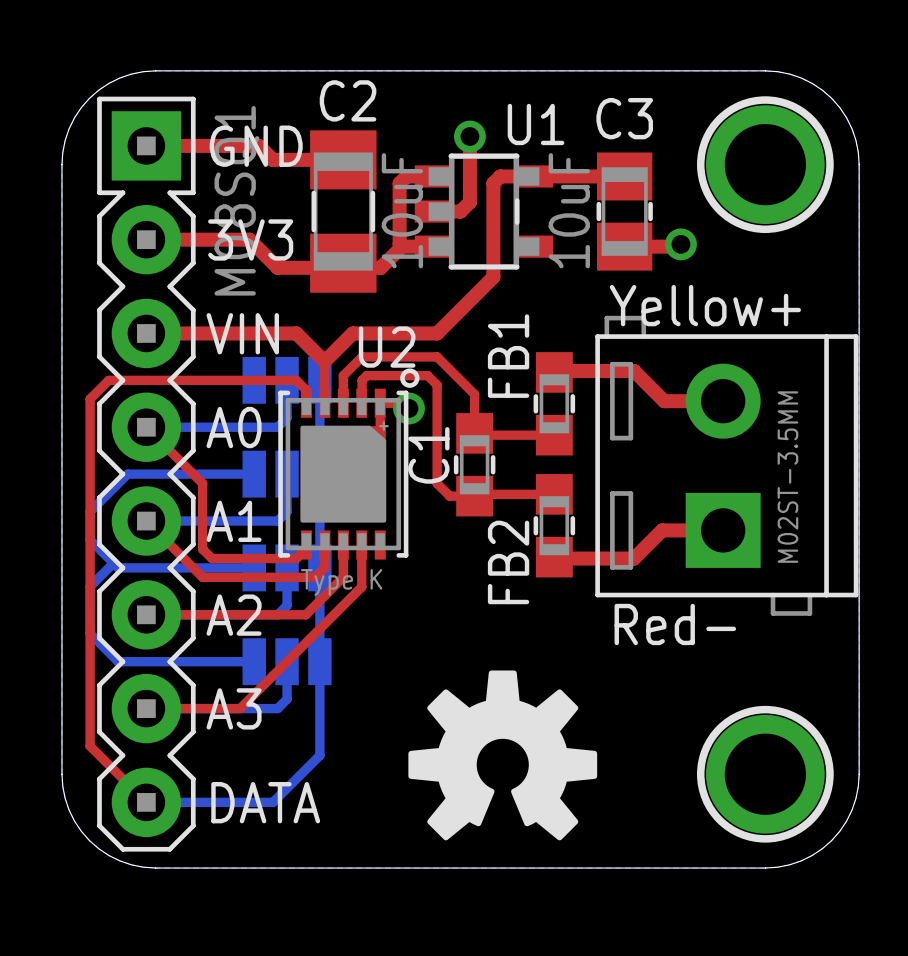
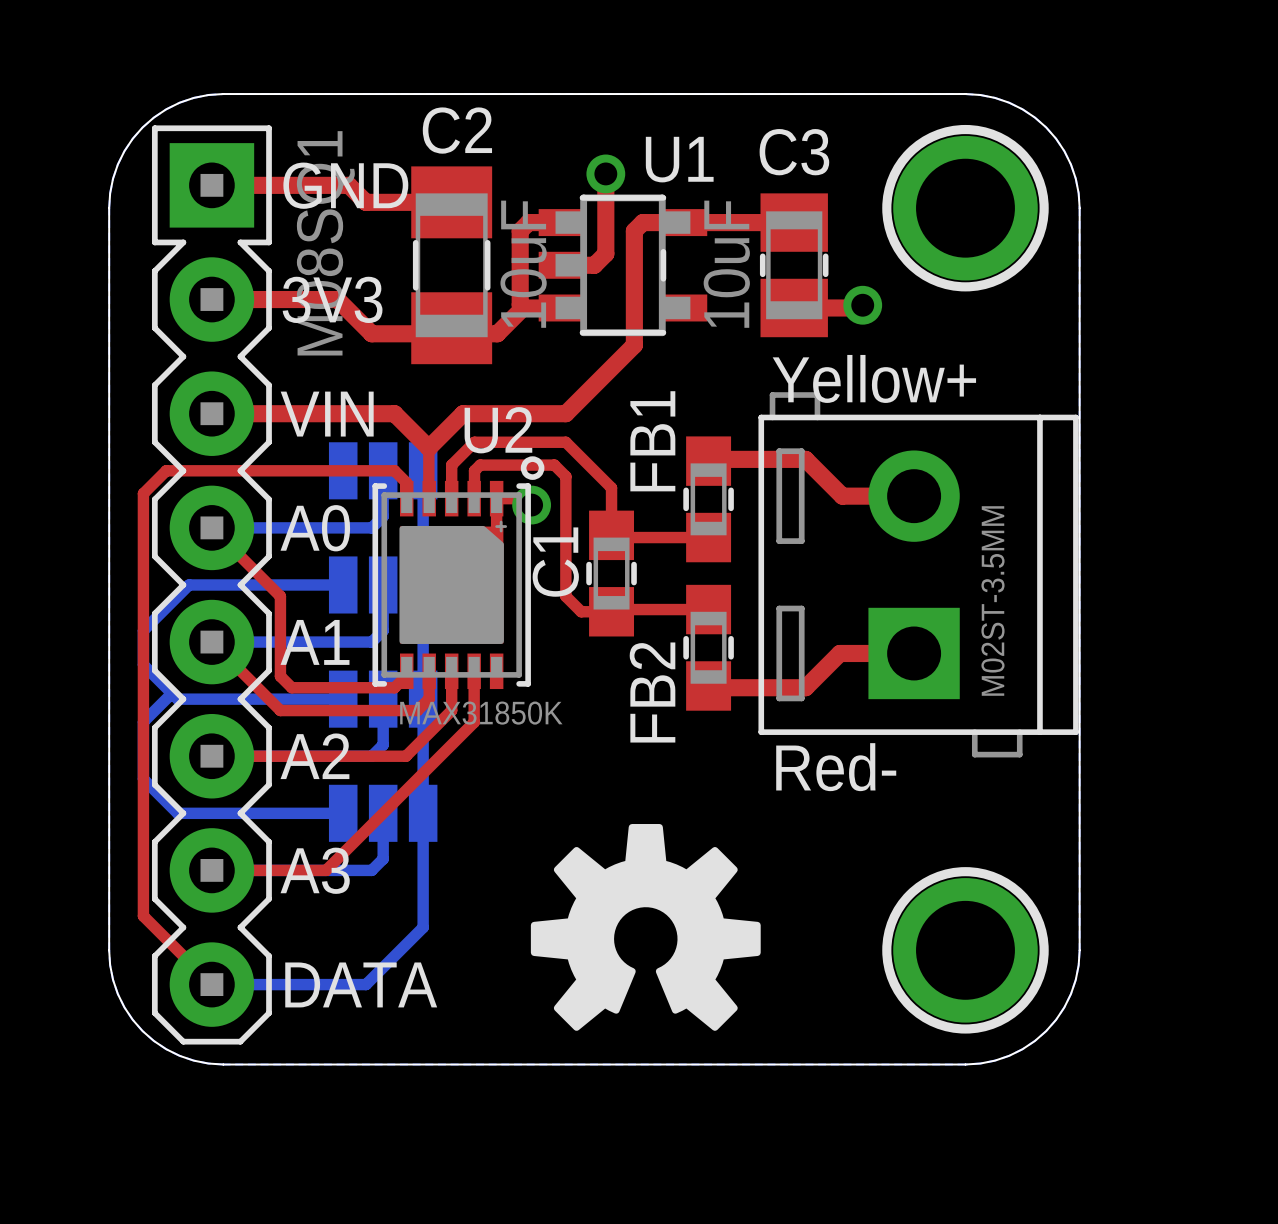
U2 value: Type K (341, 582) -> MAX31850K (481, 713)

